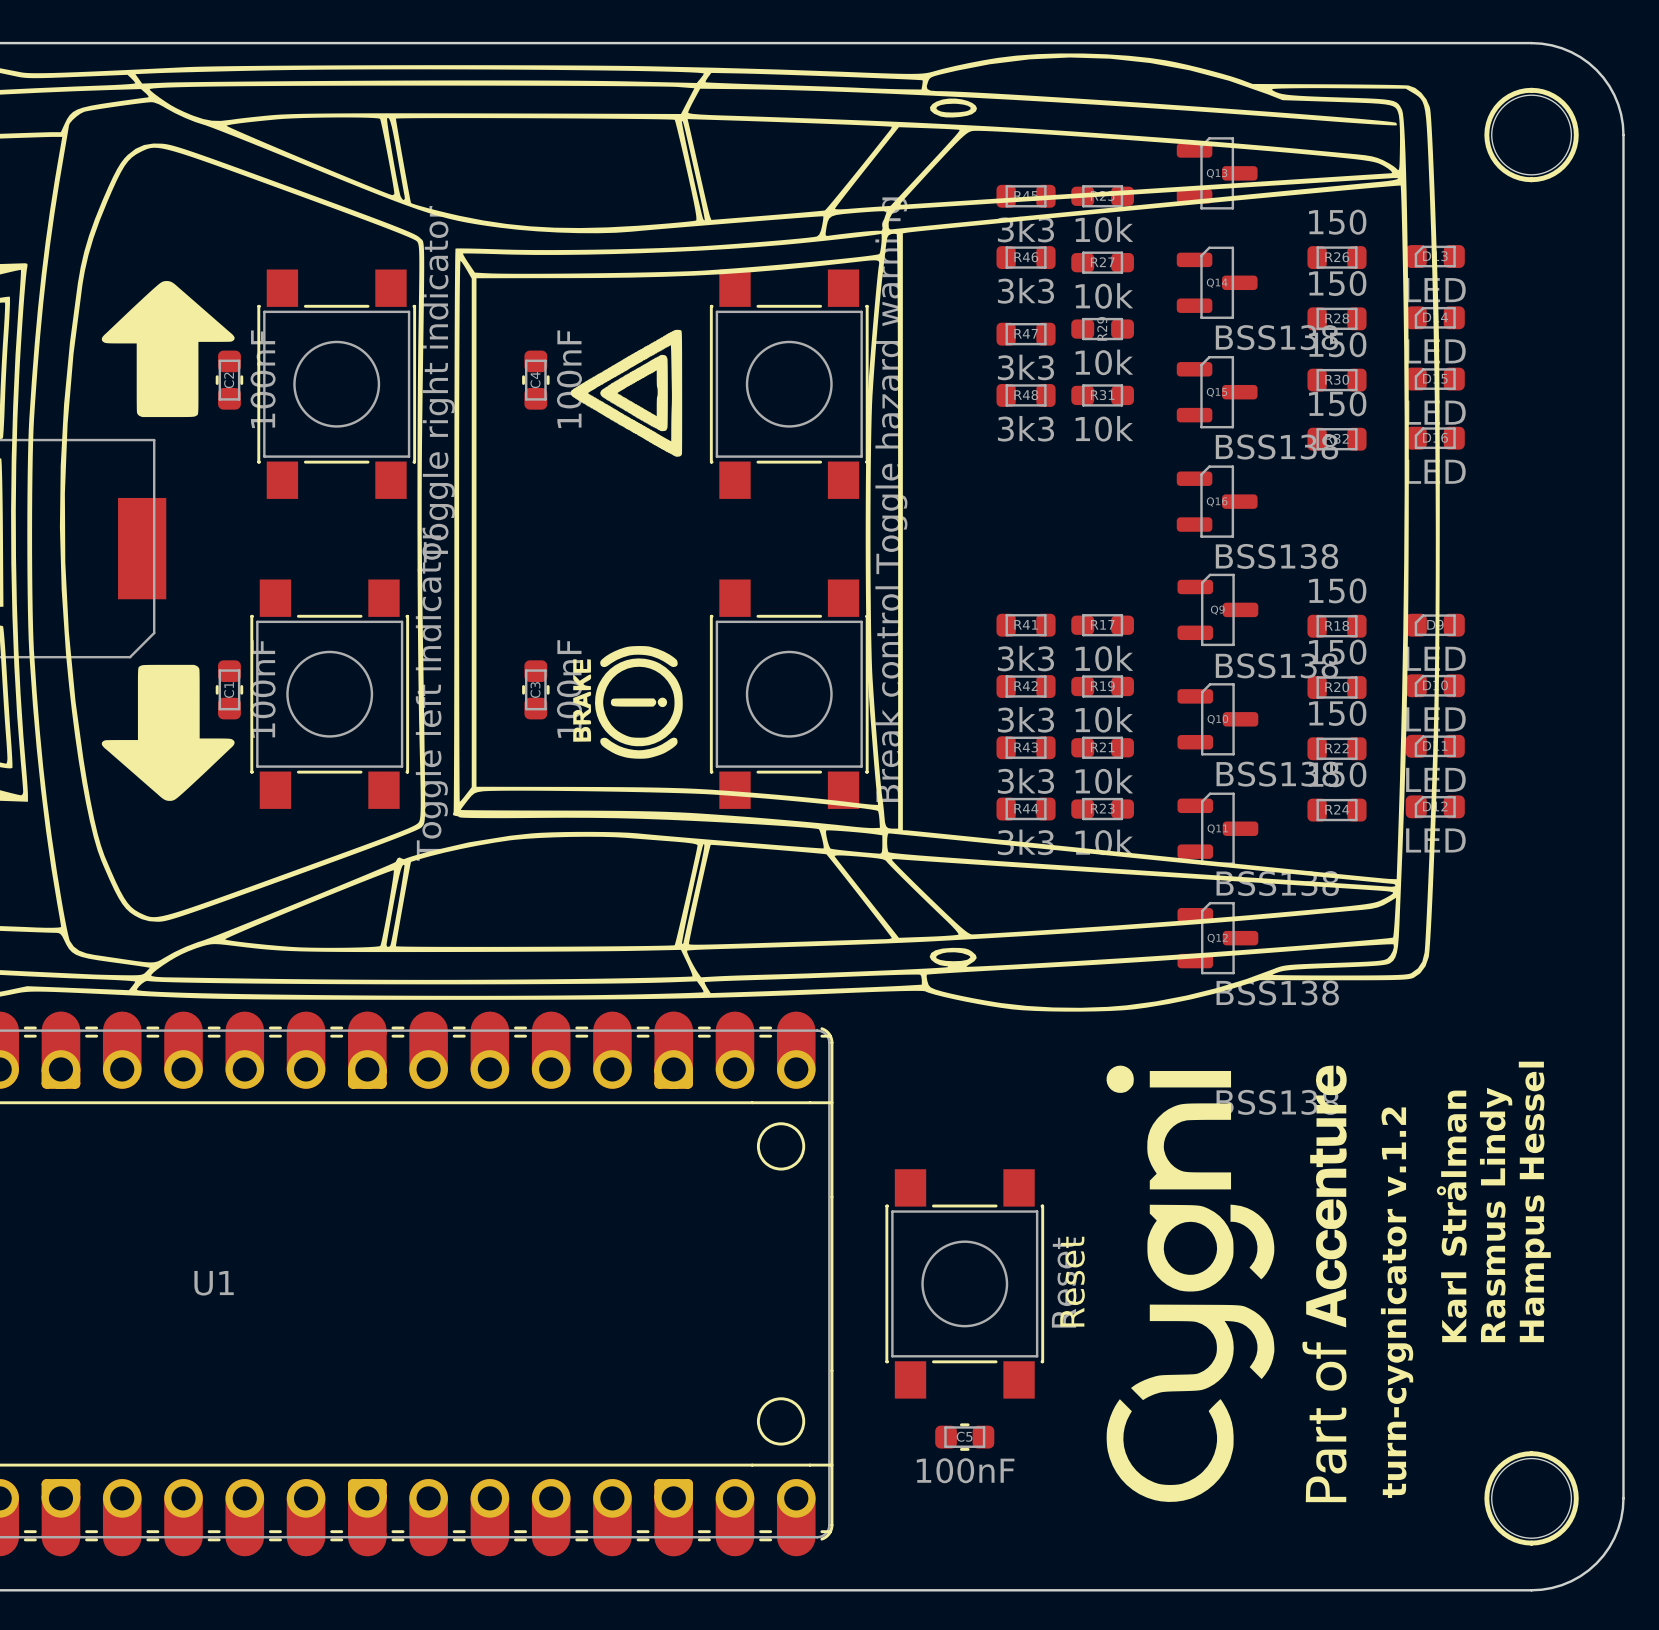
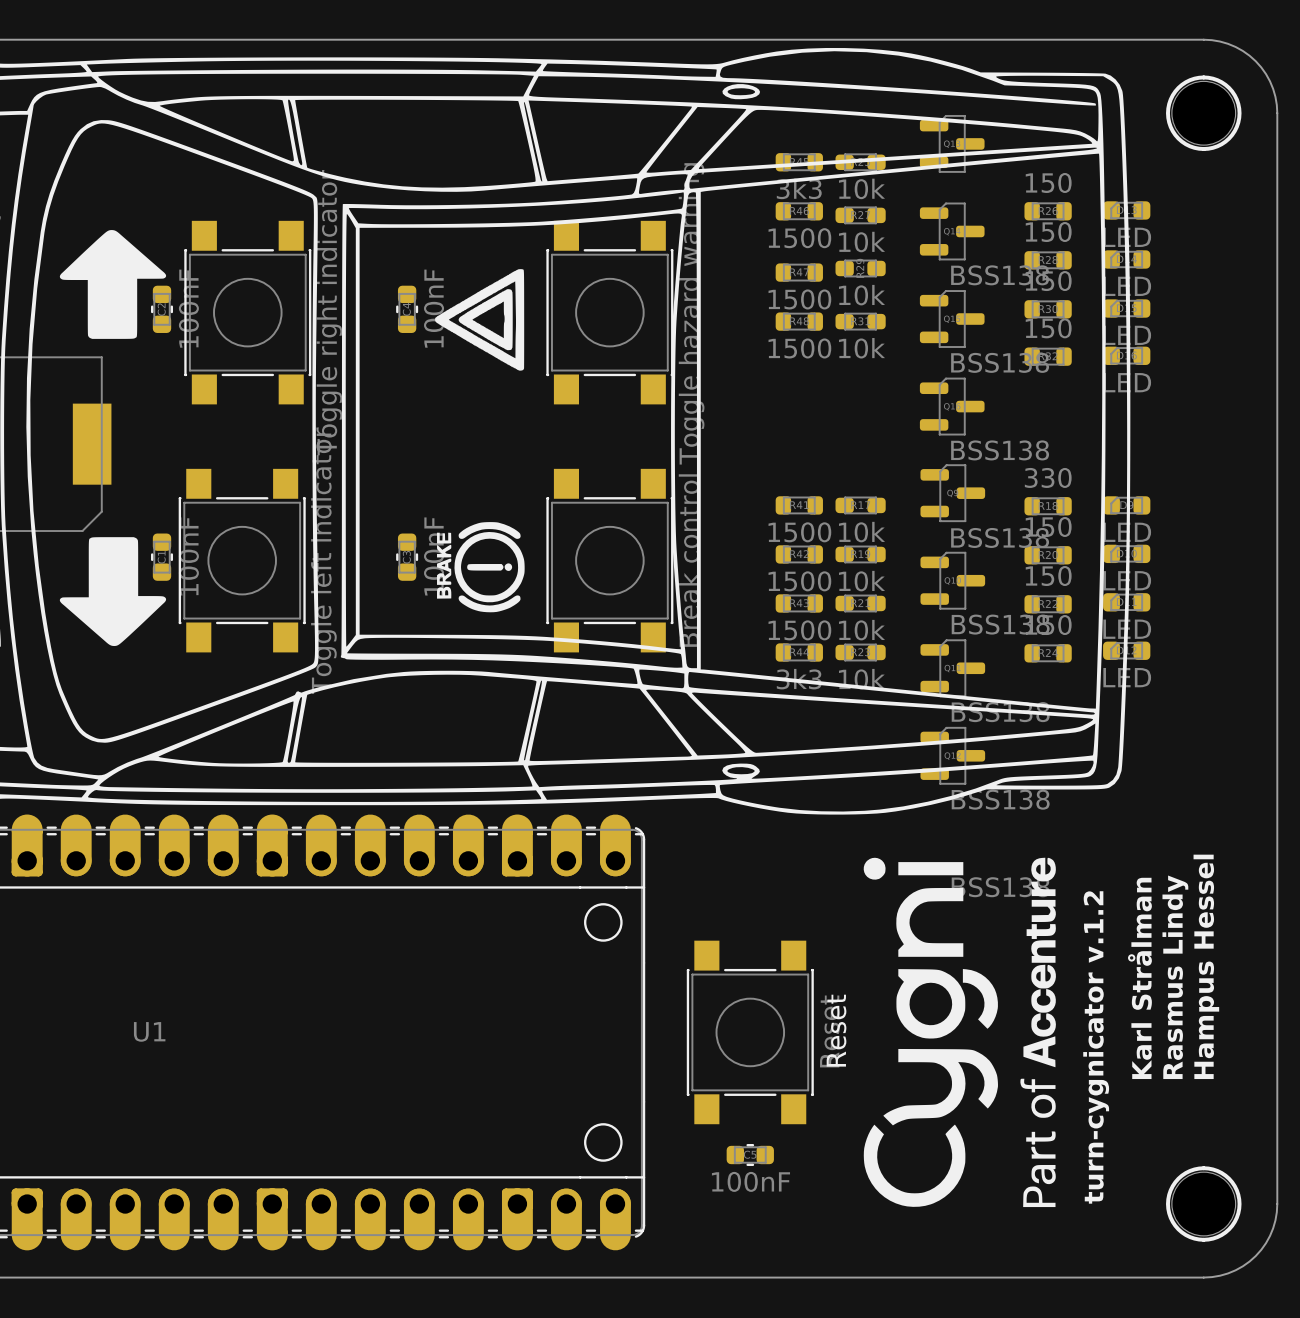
R46 value: 3k3 (1025, 290) -> 1500 (799, 238)
R47 value: 3k3 (1025, 367) -> 1500 (799, 299)
R48 value: 3k3 (1025, 428) -> 1500 (799, 348)
R18 value: 150 (1337, 590) -> 330 (1048, 477)
R41 value: 3k3 (1025, 658) -> 1500 (799, 532)
R42 value: 3k3 (1025, 719) -> 1500 (799, 581)
R43 value: 3k3 (1025, 781) -> 1500 (799, 630)

